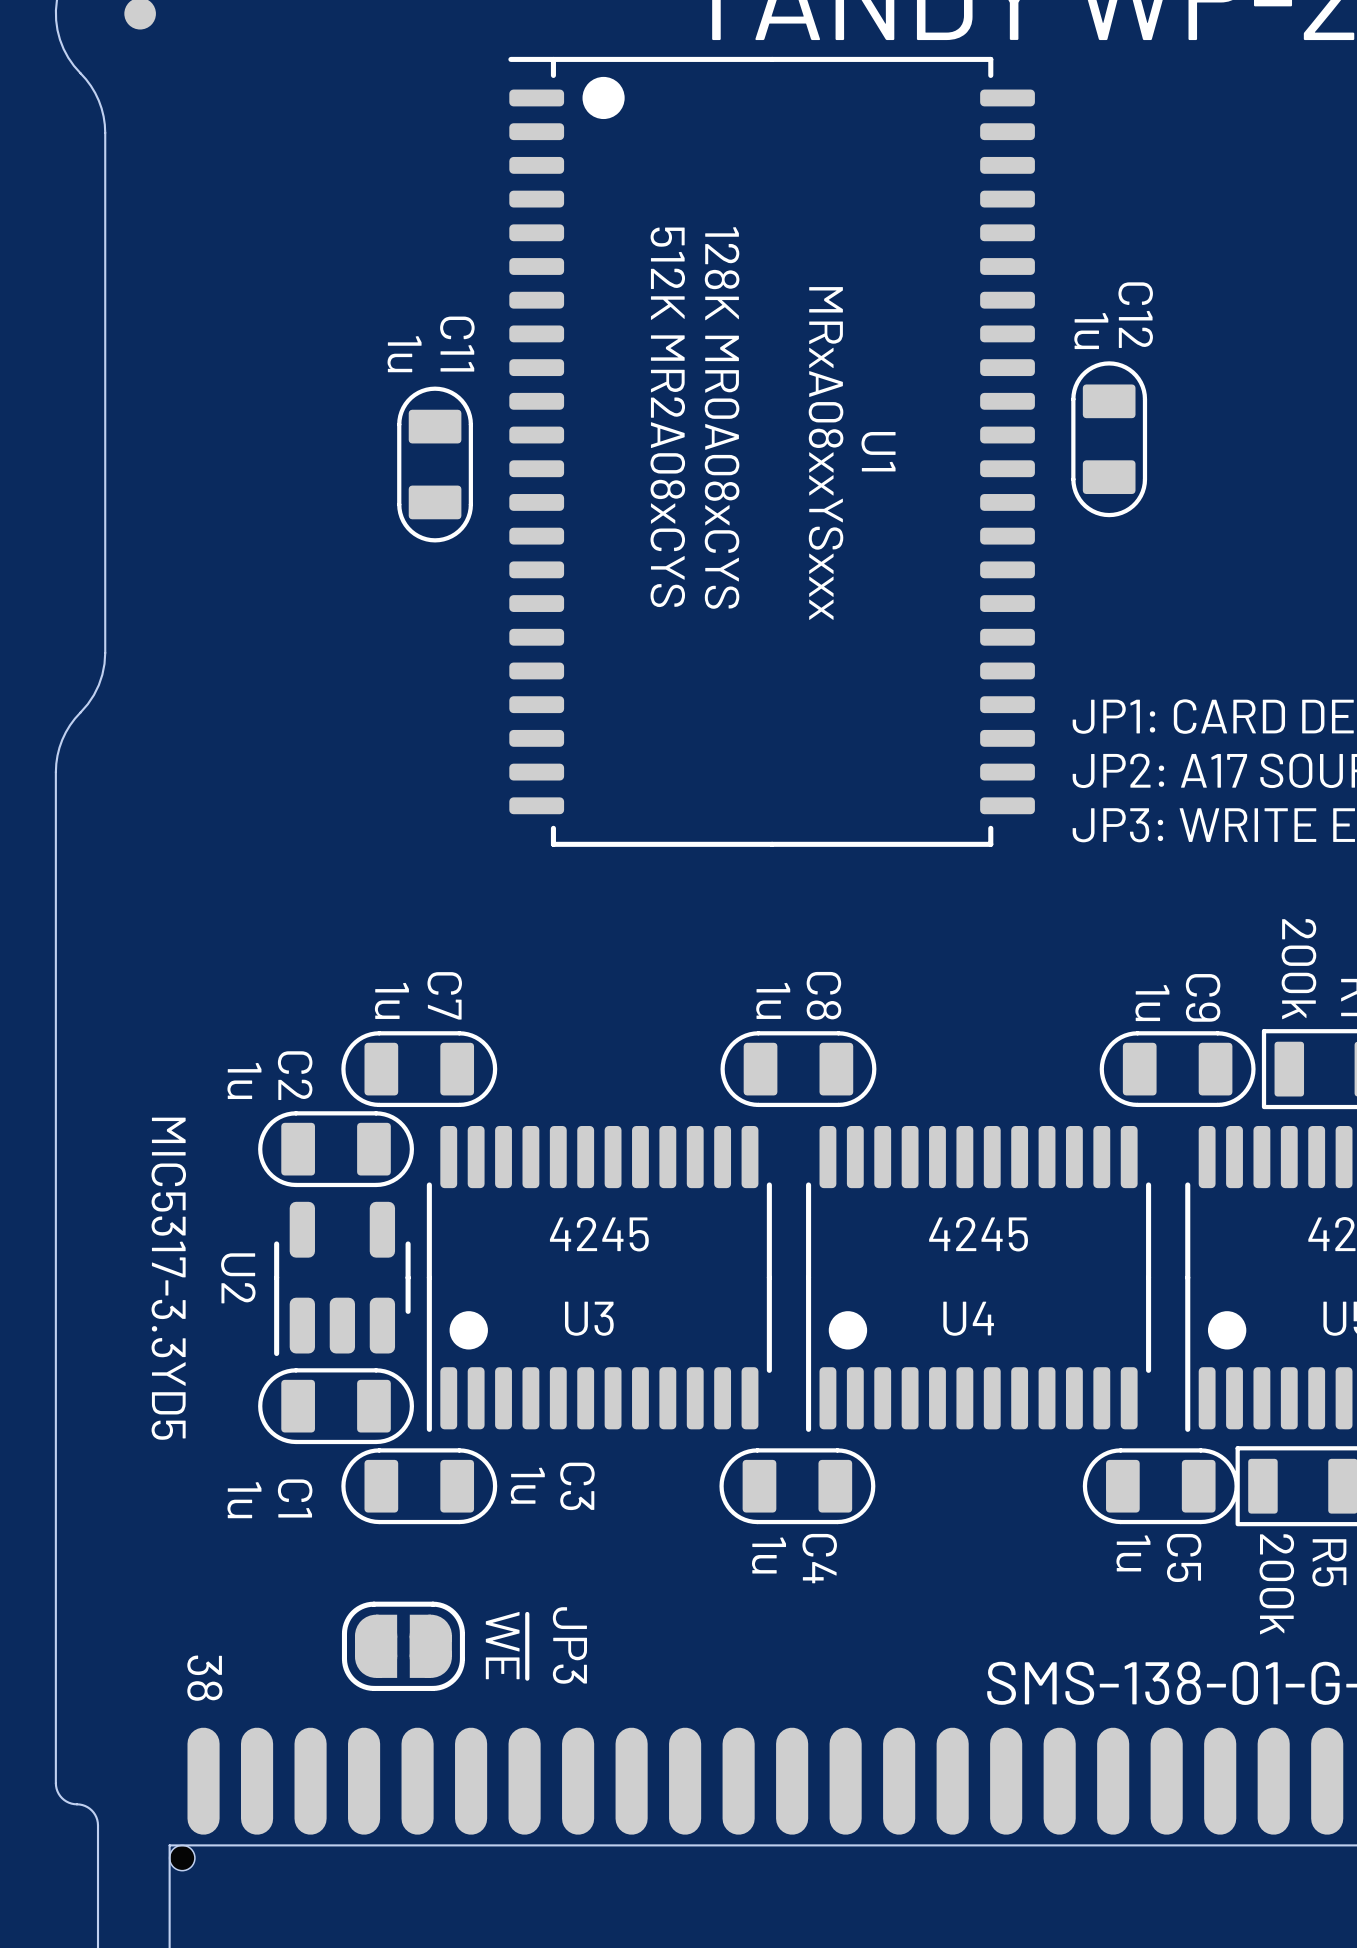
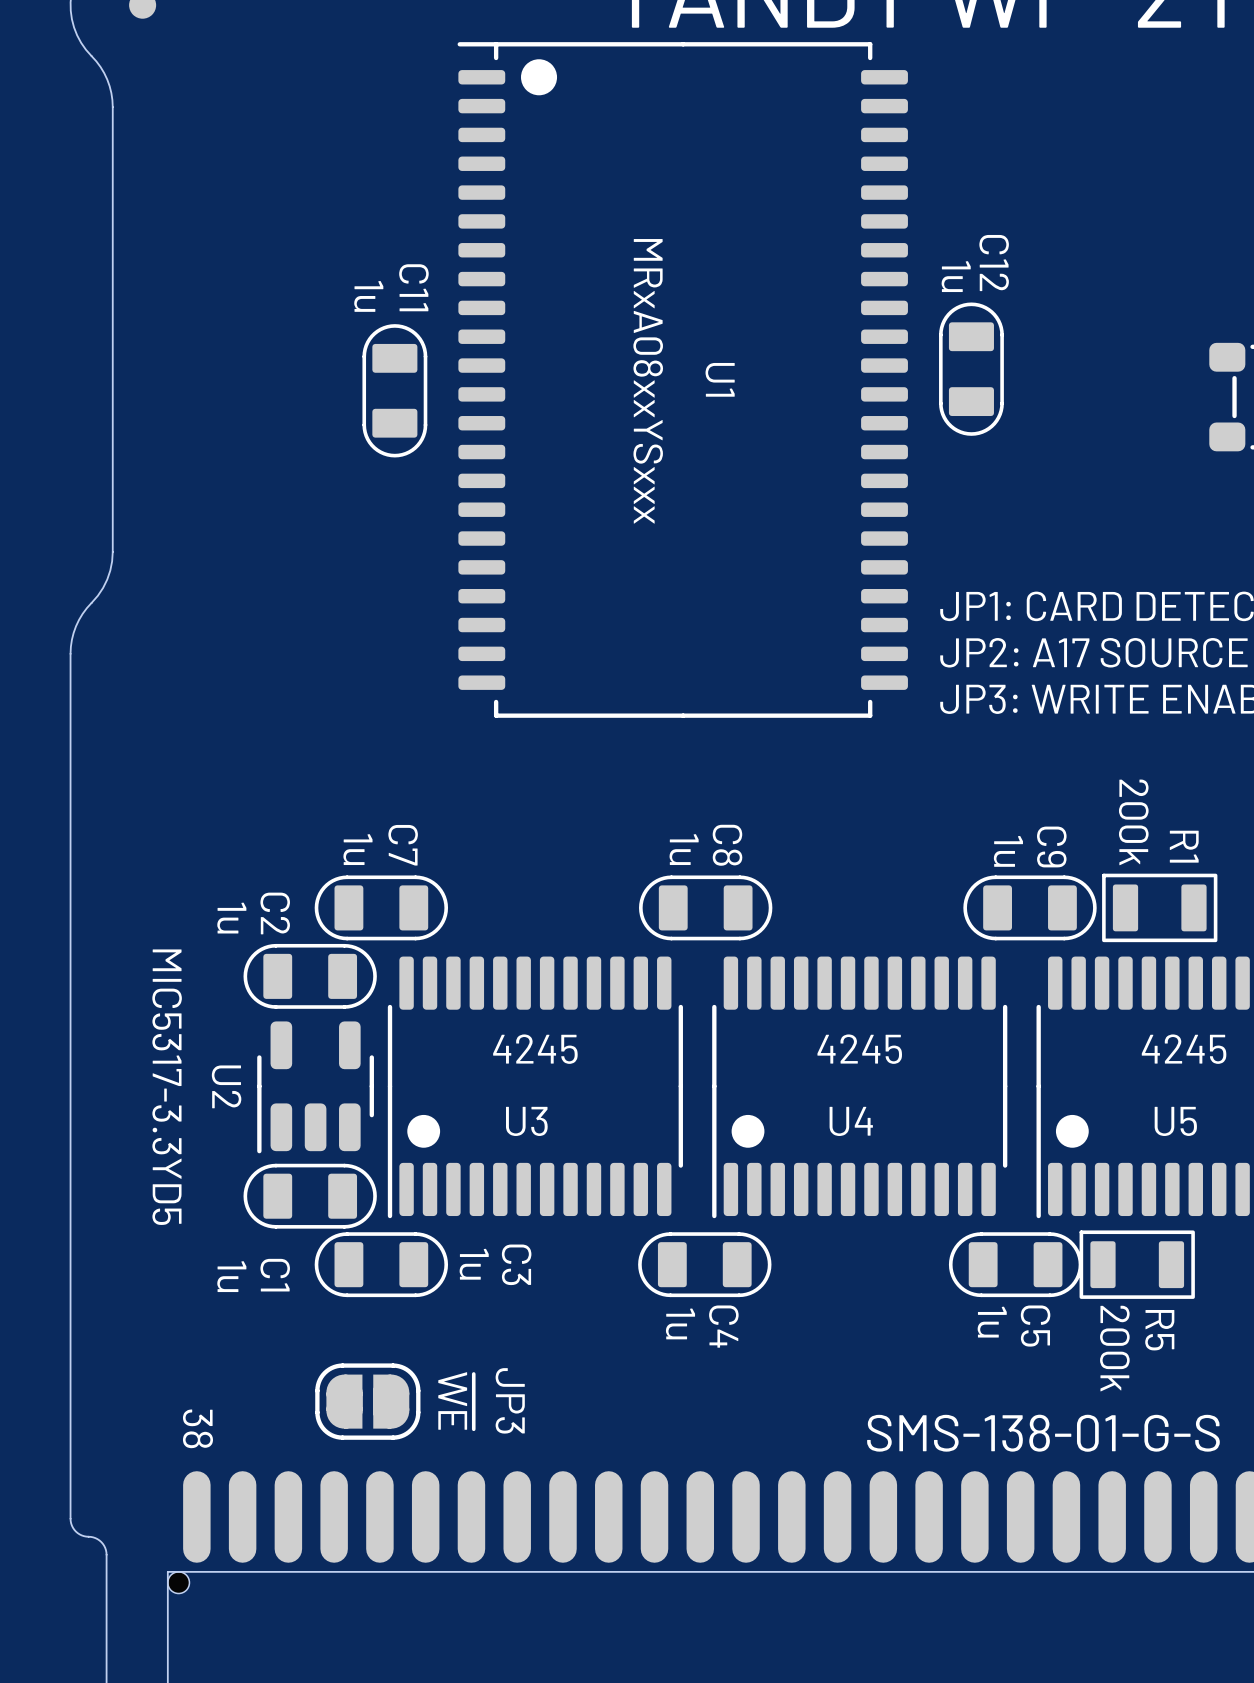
text: 512K MR2A08xCYS (667, 417) -> none
text: 128K MR0A08xCYS (722, 417) -> none
U1 name position: U1 (878, 451) -> U1 (720, 379)
U1 value position: MRxA08xxYSxxx (826, 453) -> MRxA08xxYSxxx (648, 381)

